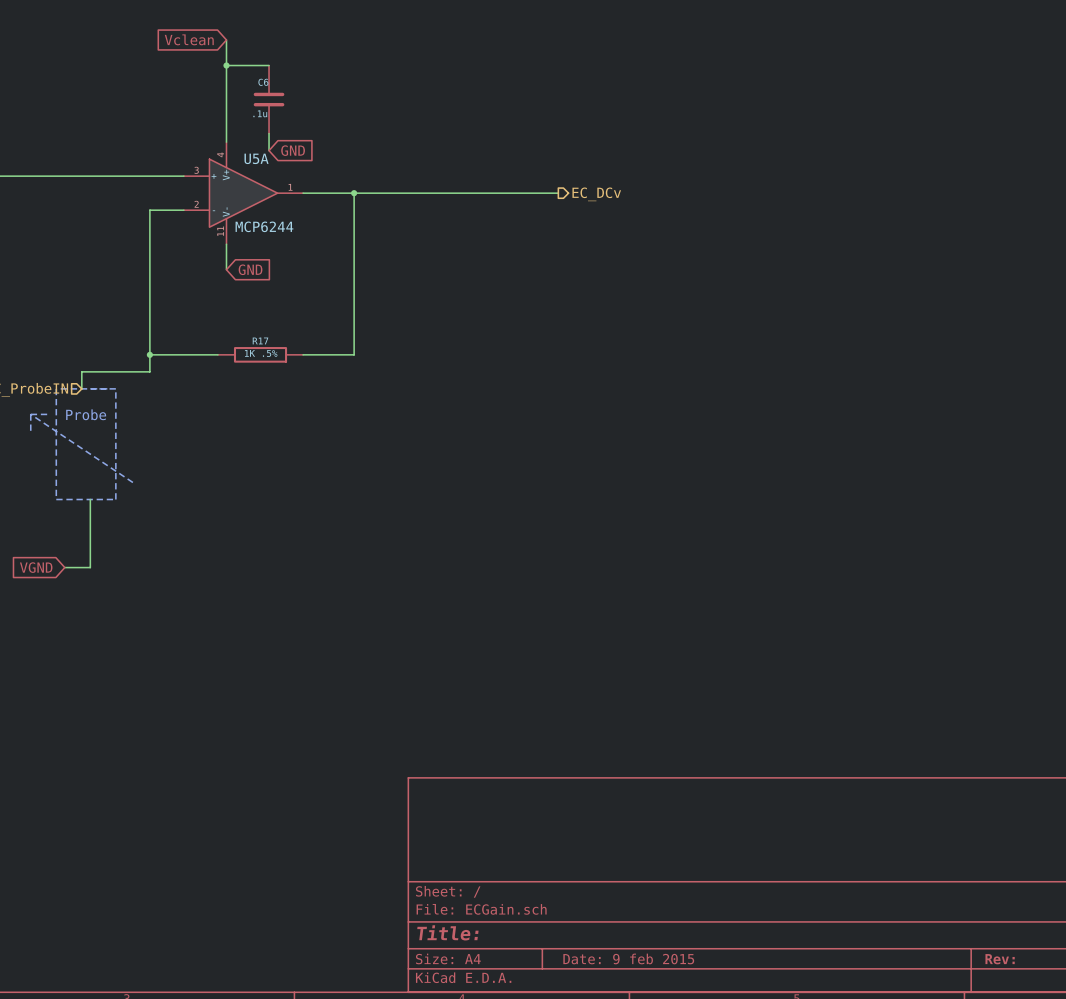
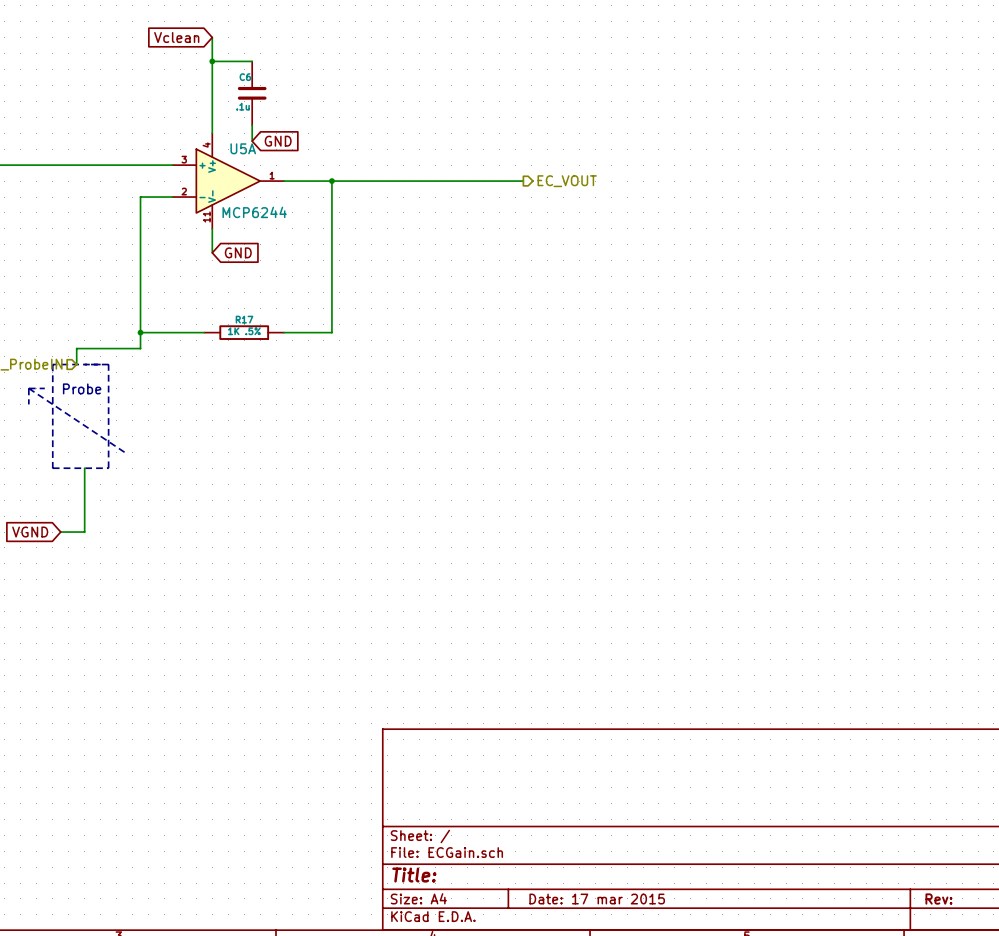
hierarchical label: EC_DCv (596, 194) -> EC_VOUT (567, 181)
title block: Date: 9 feb 2015 (628, 958) -> Date: 17 mar 2015 (597, 899)

